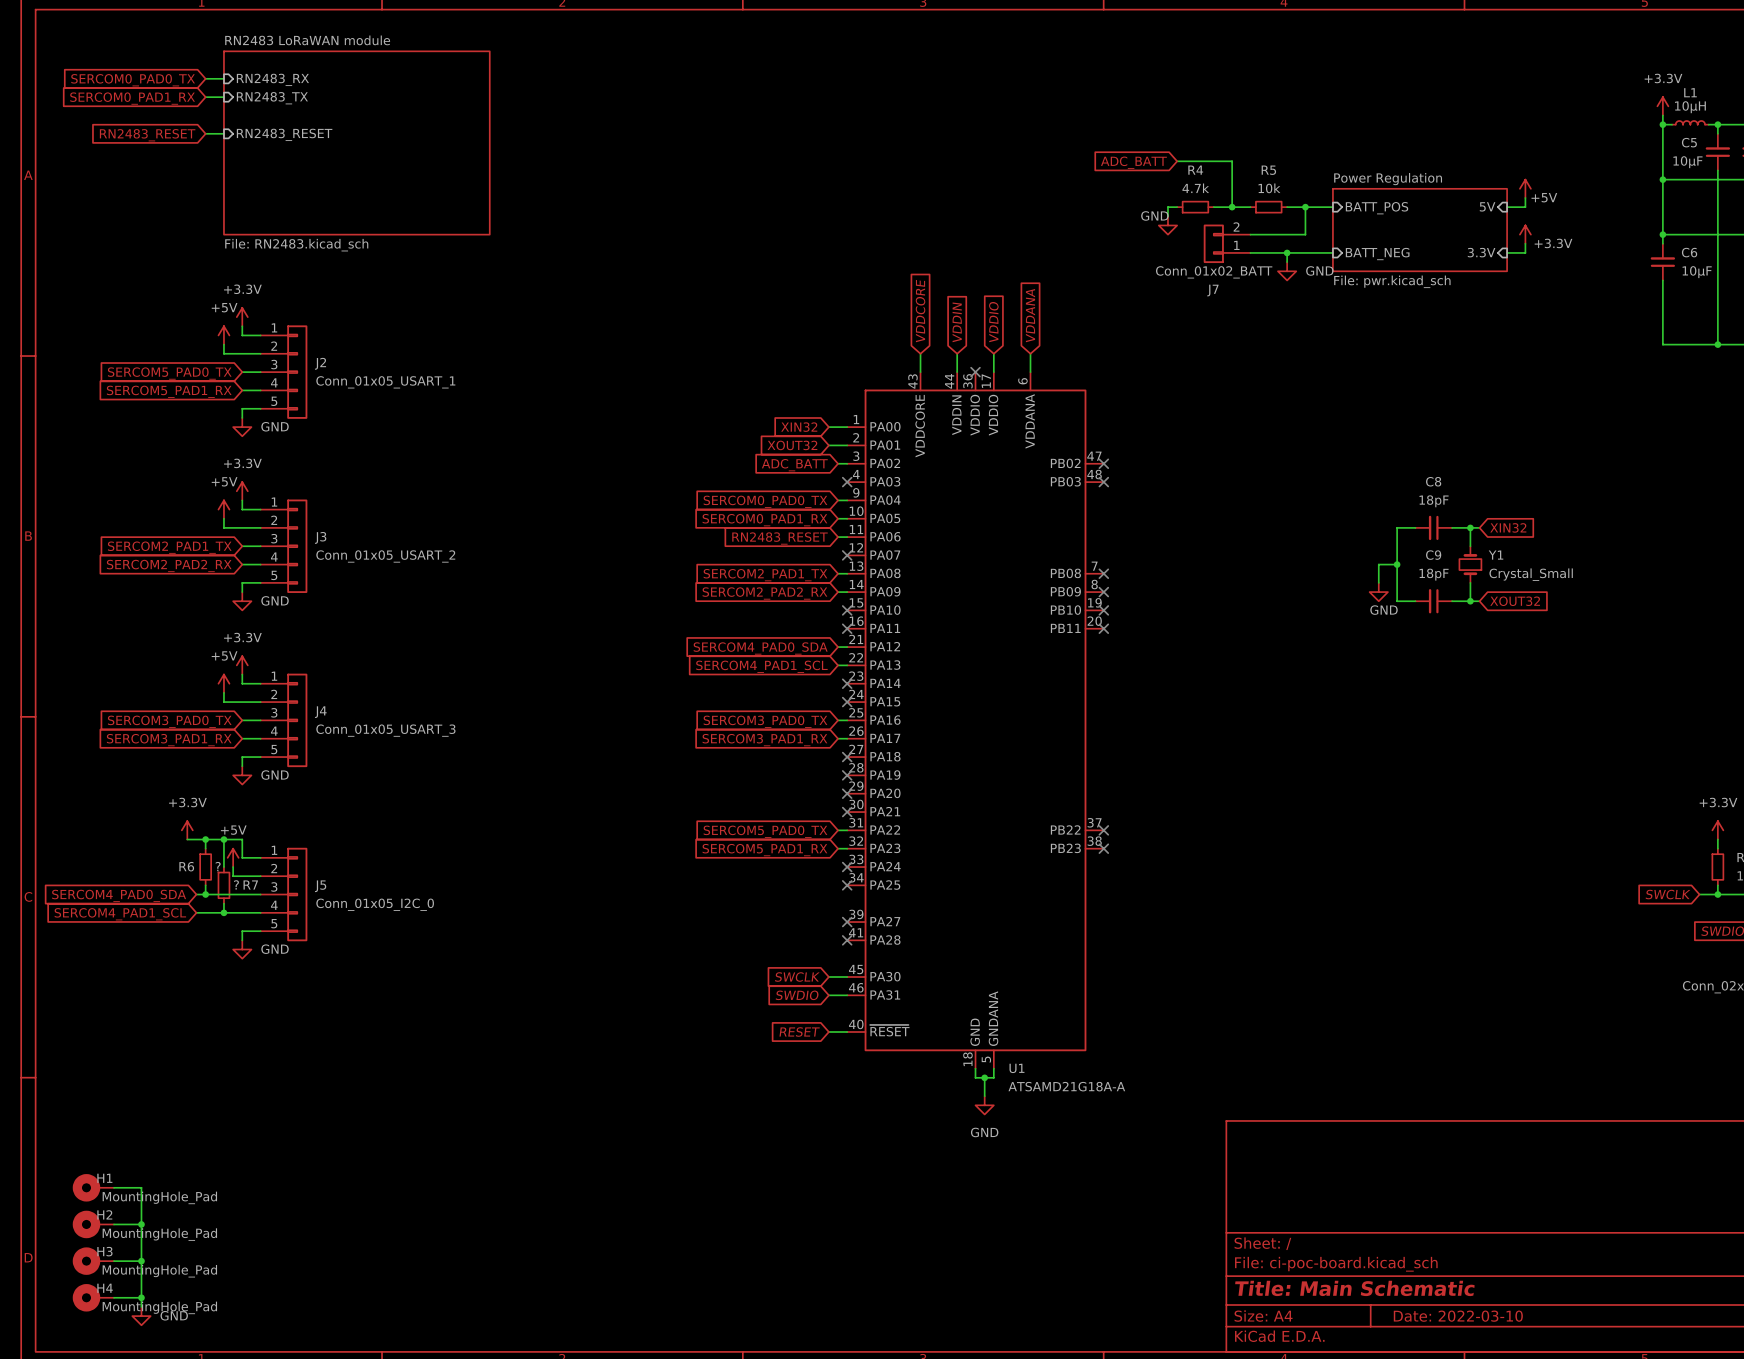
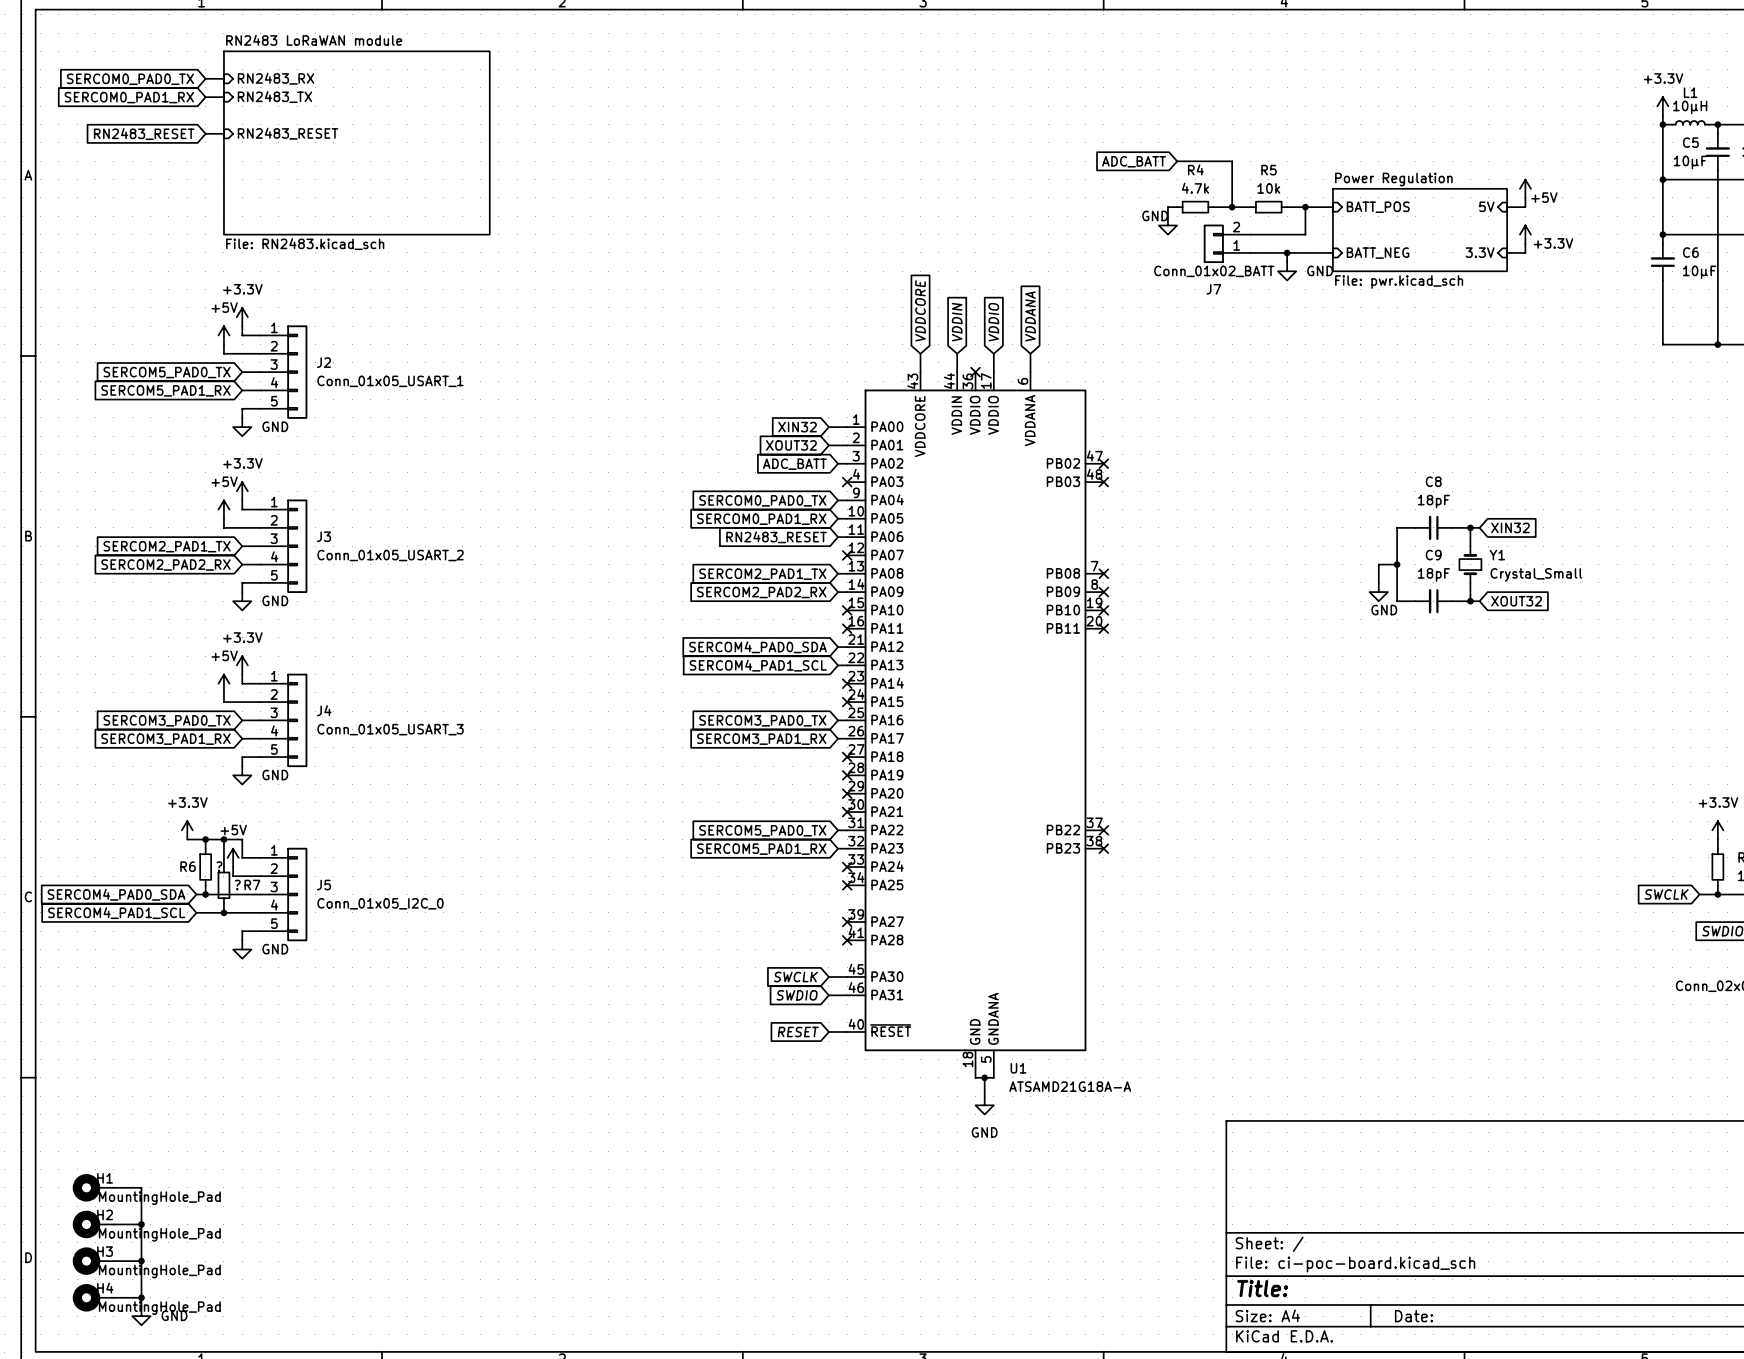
title block: Title: Main Schematic (1354, 1288) -> Title: (1262, 1288)
title block: Date: 2022-03-10 (1458, 1316) -> Date: (1413, 1316)

